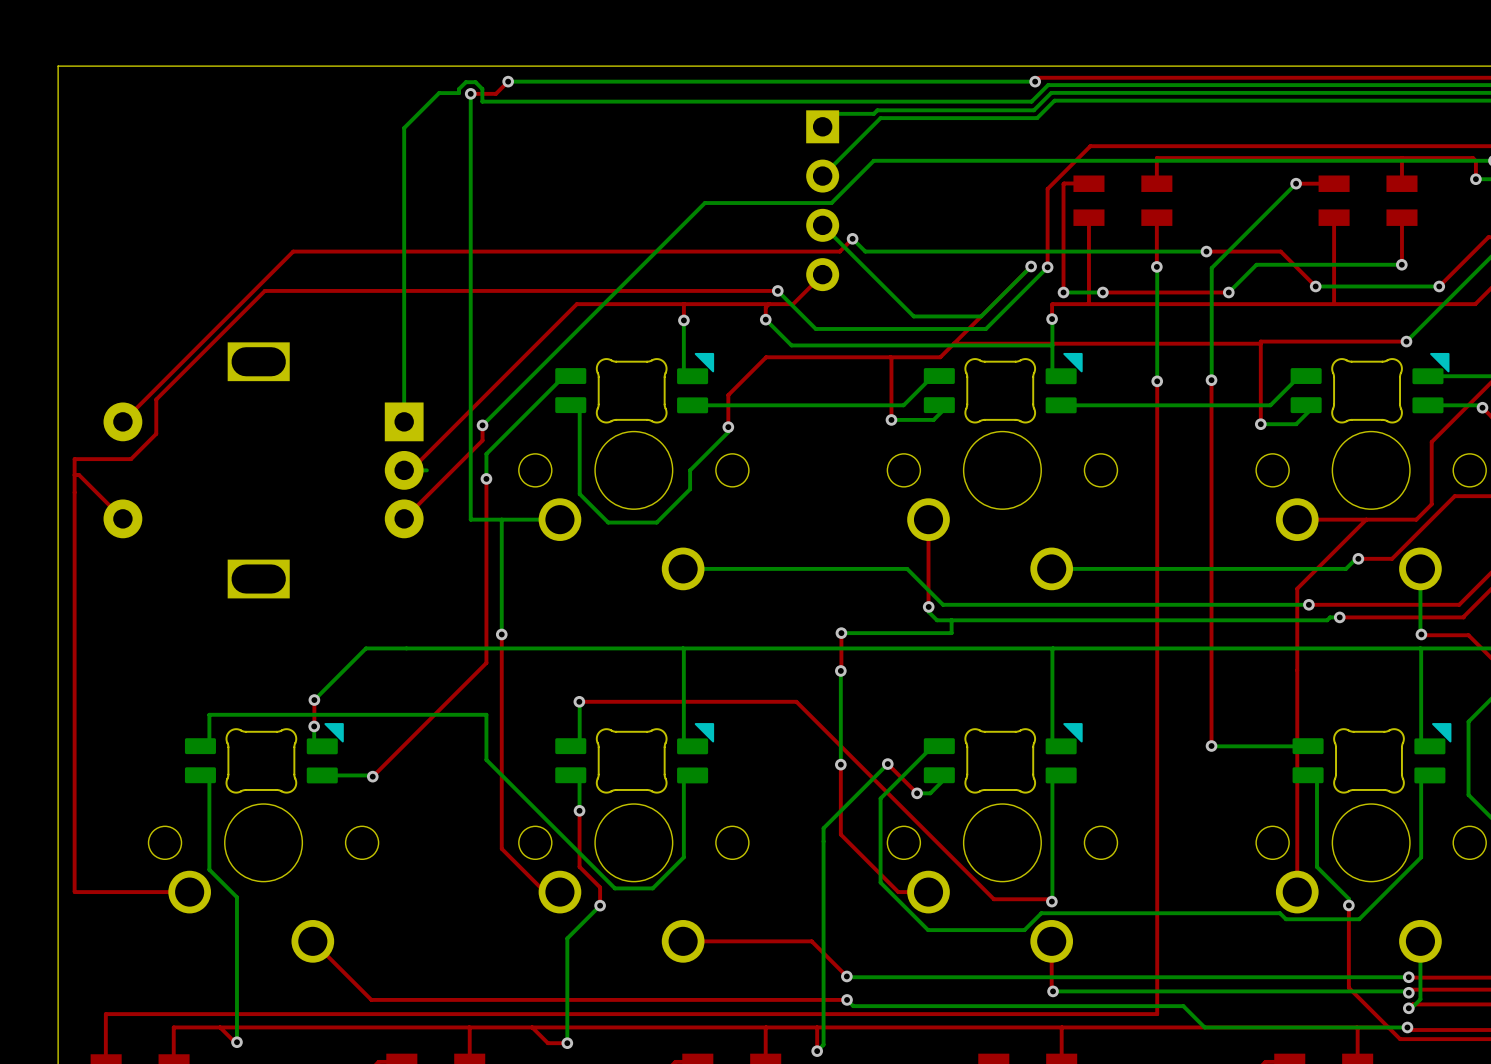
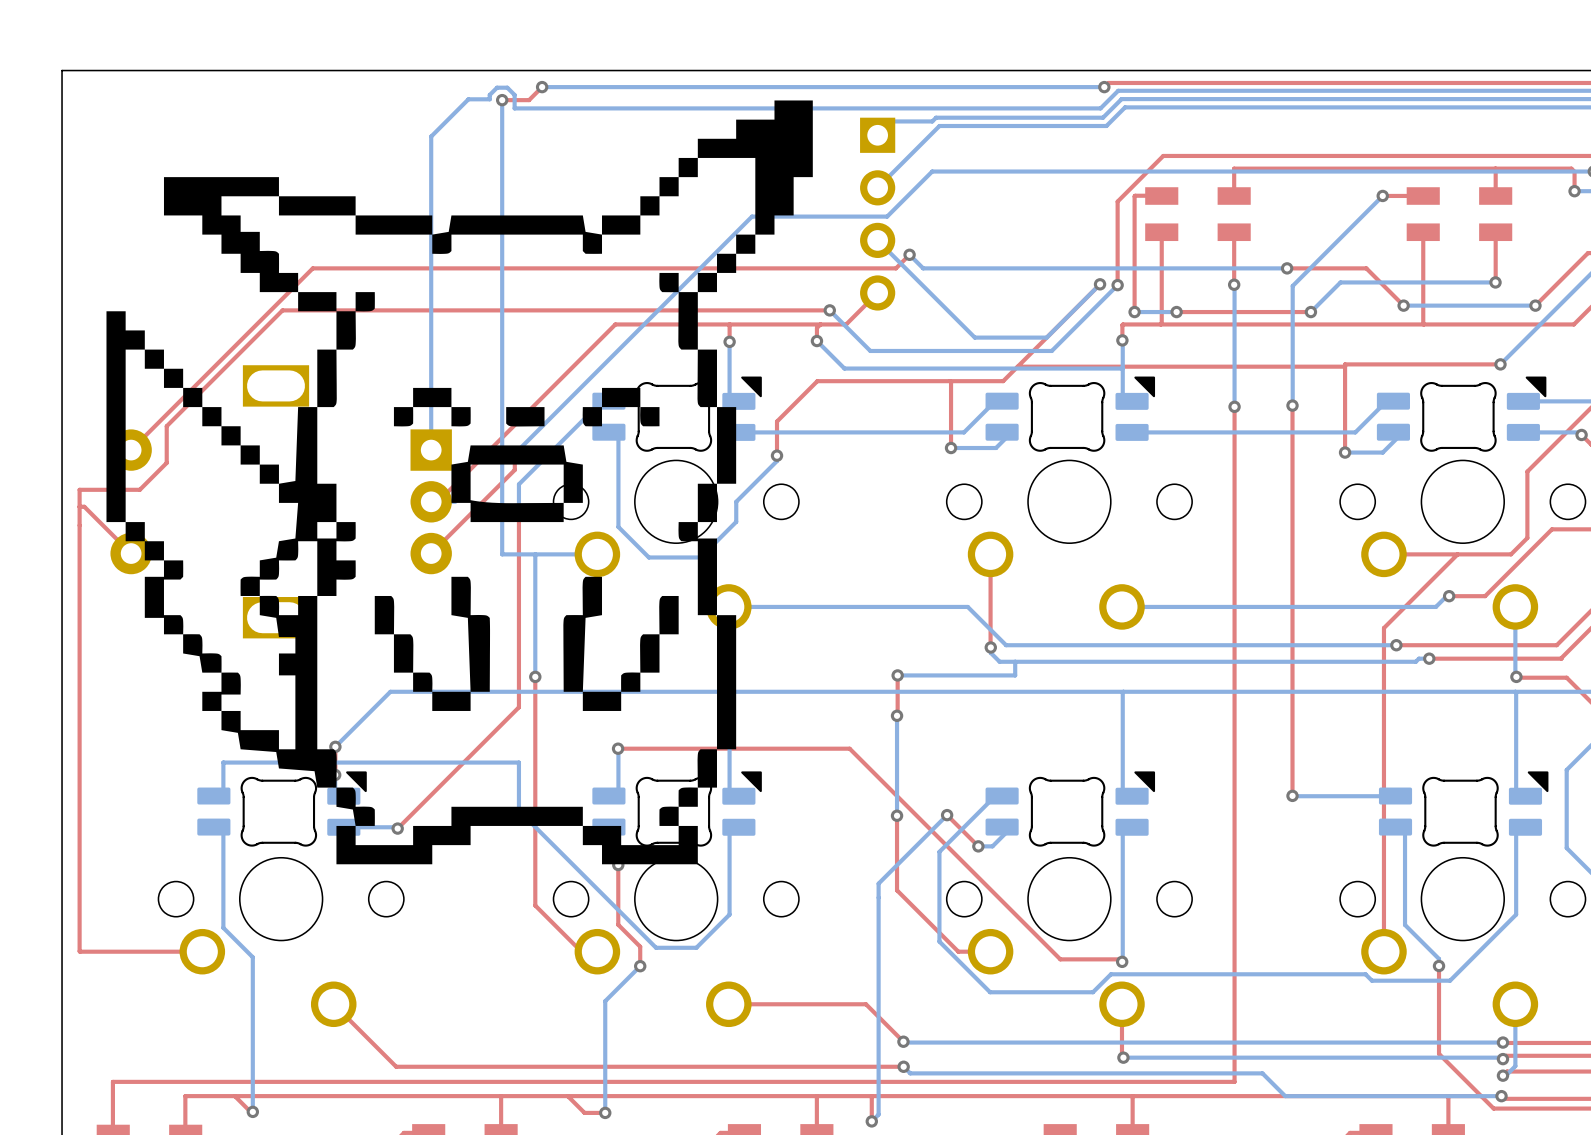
drawing: none -> [106, 100, 813, 865]
drawing: none -> [393, 387, 660, 523]

